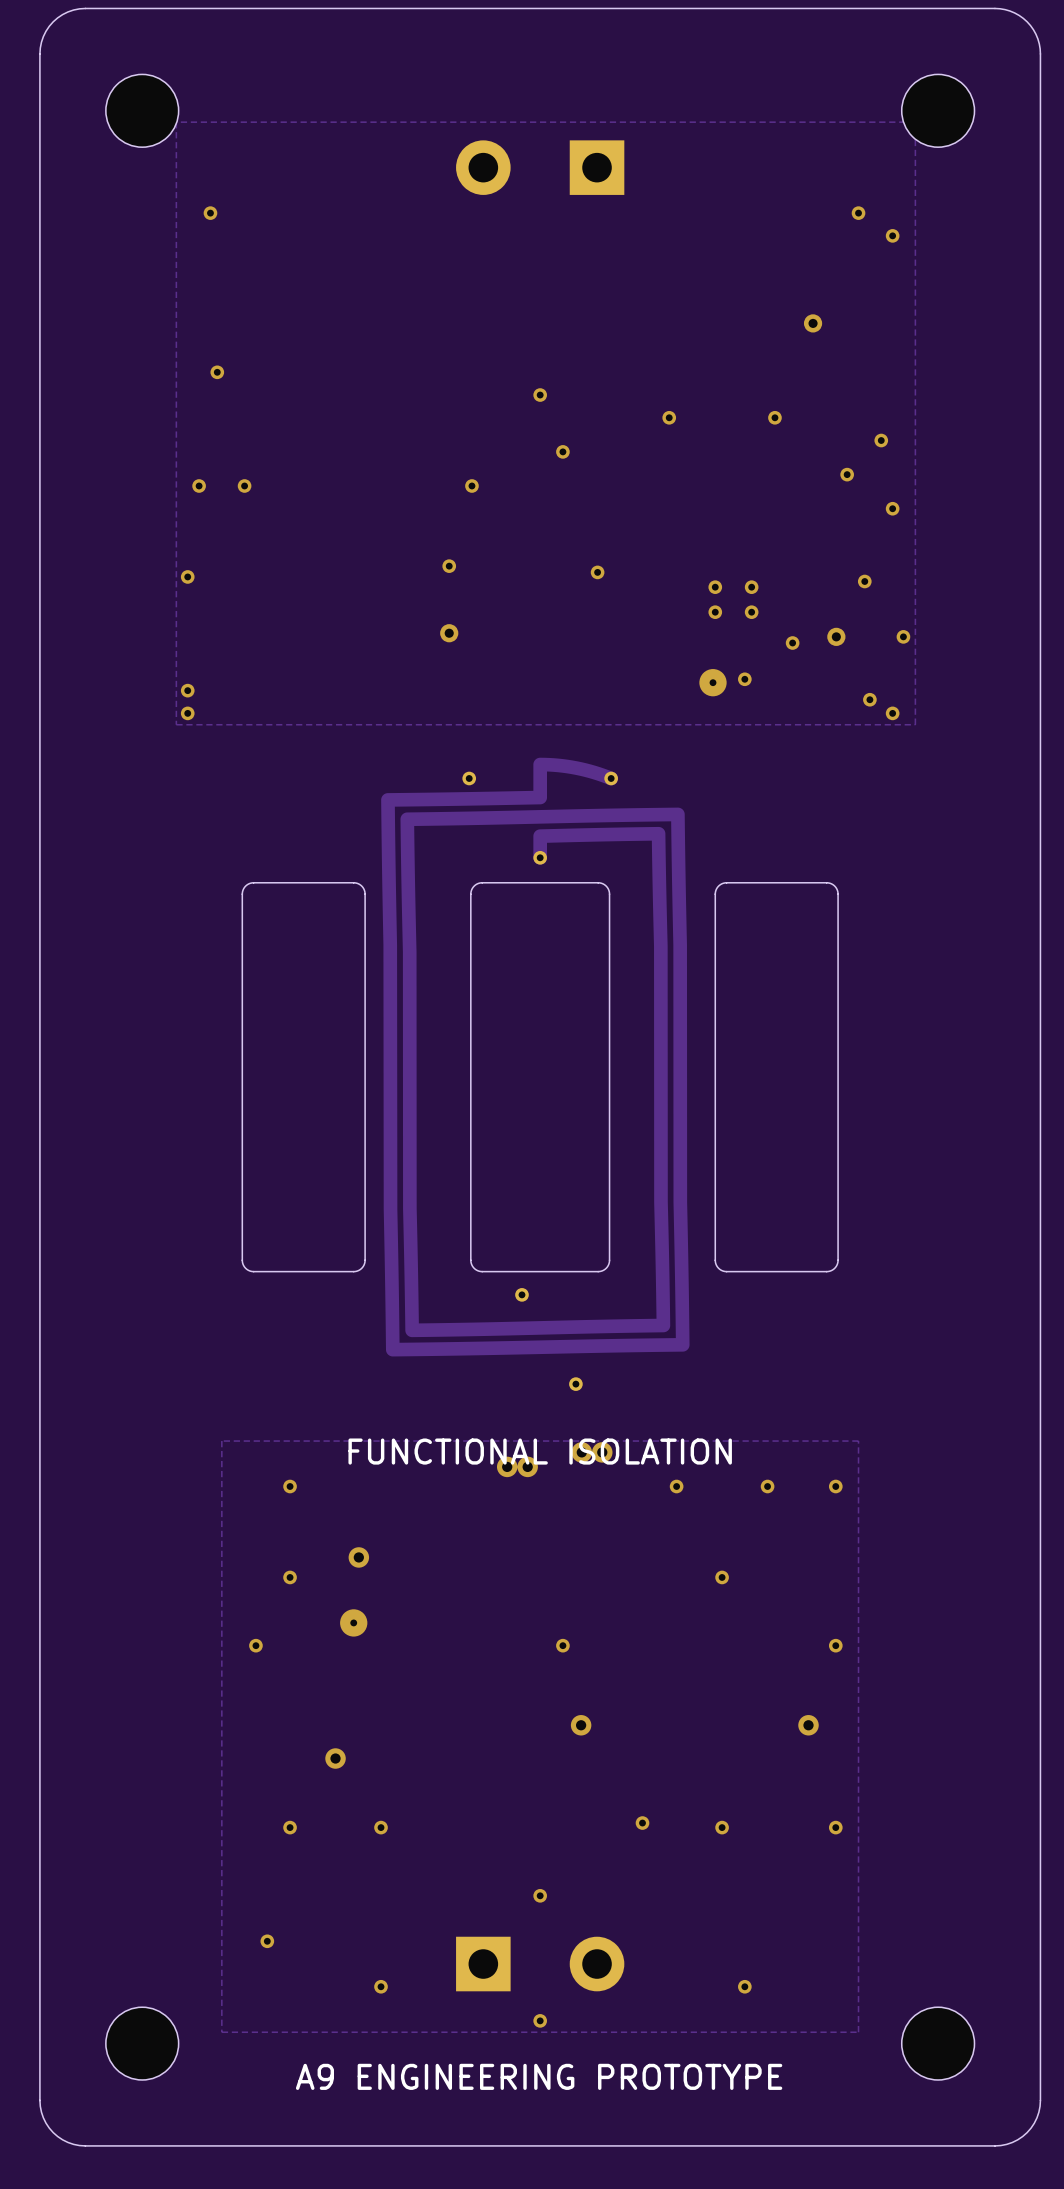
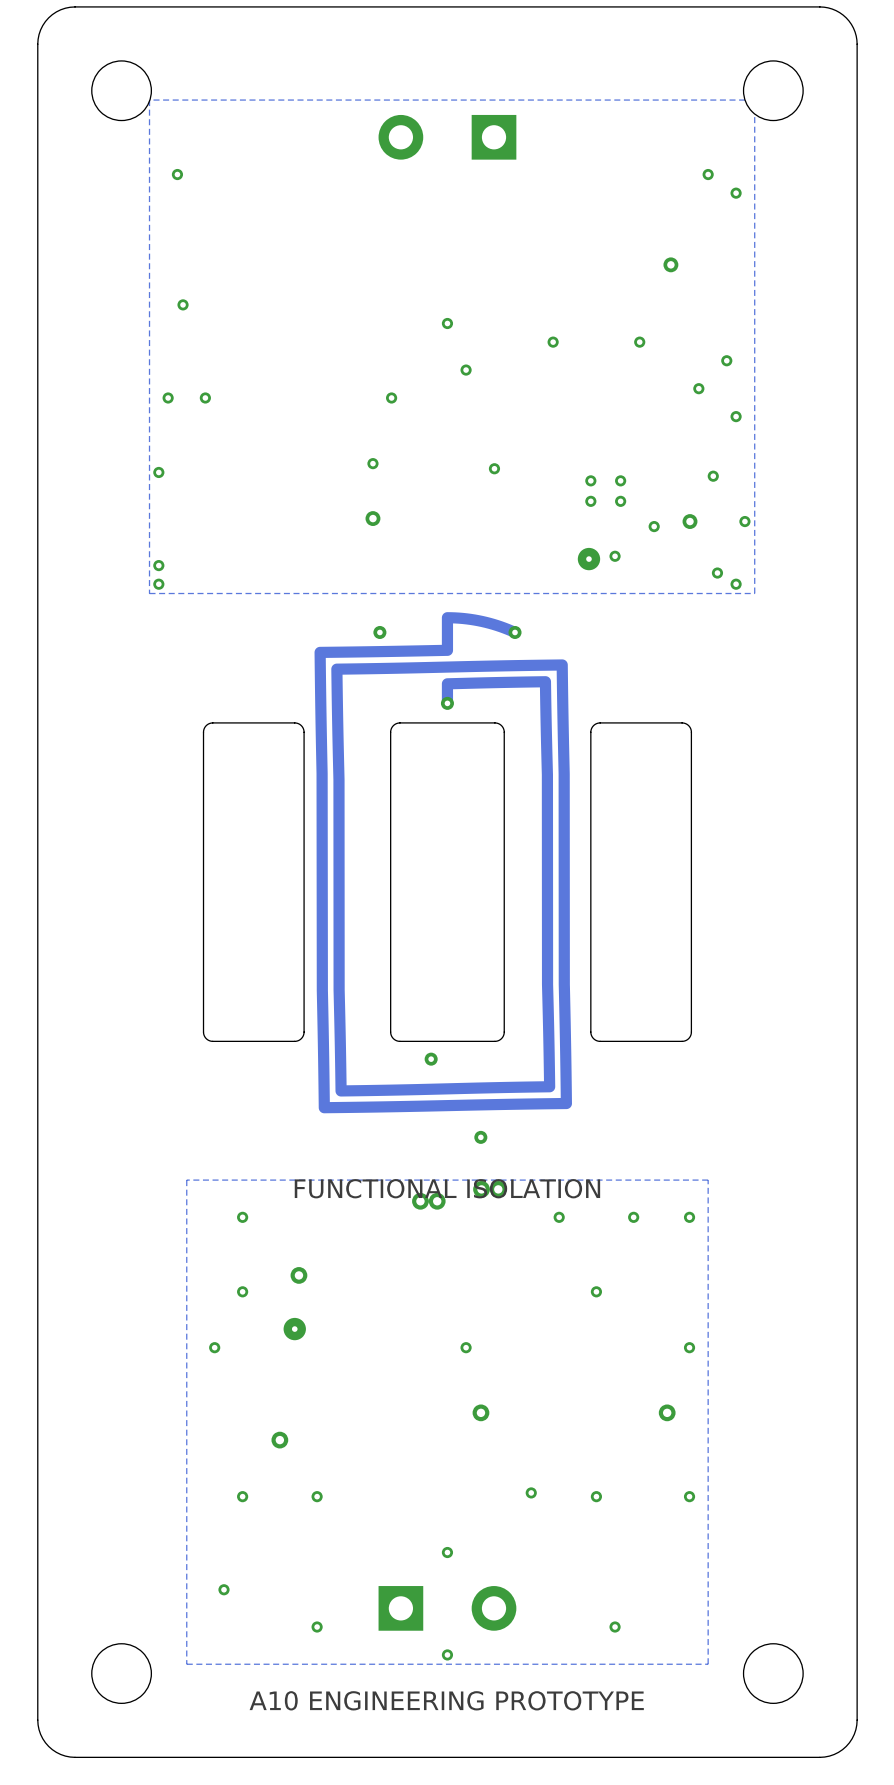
part footprint: [381, 757, 690, 1391] -> [314, 612, 572, 1144]
text: A9 ENGINEERING PROTOTYPE (539, 2076) -> A10 ENGINEERING PROTOTYPE (446, 1700)

